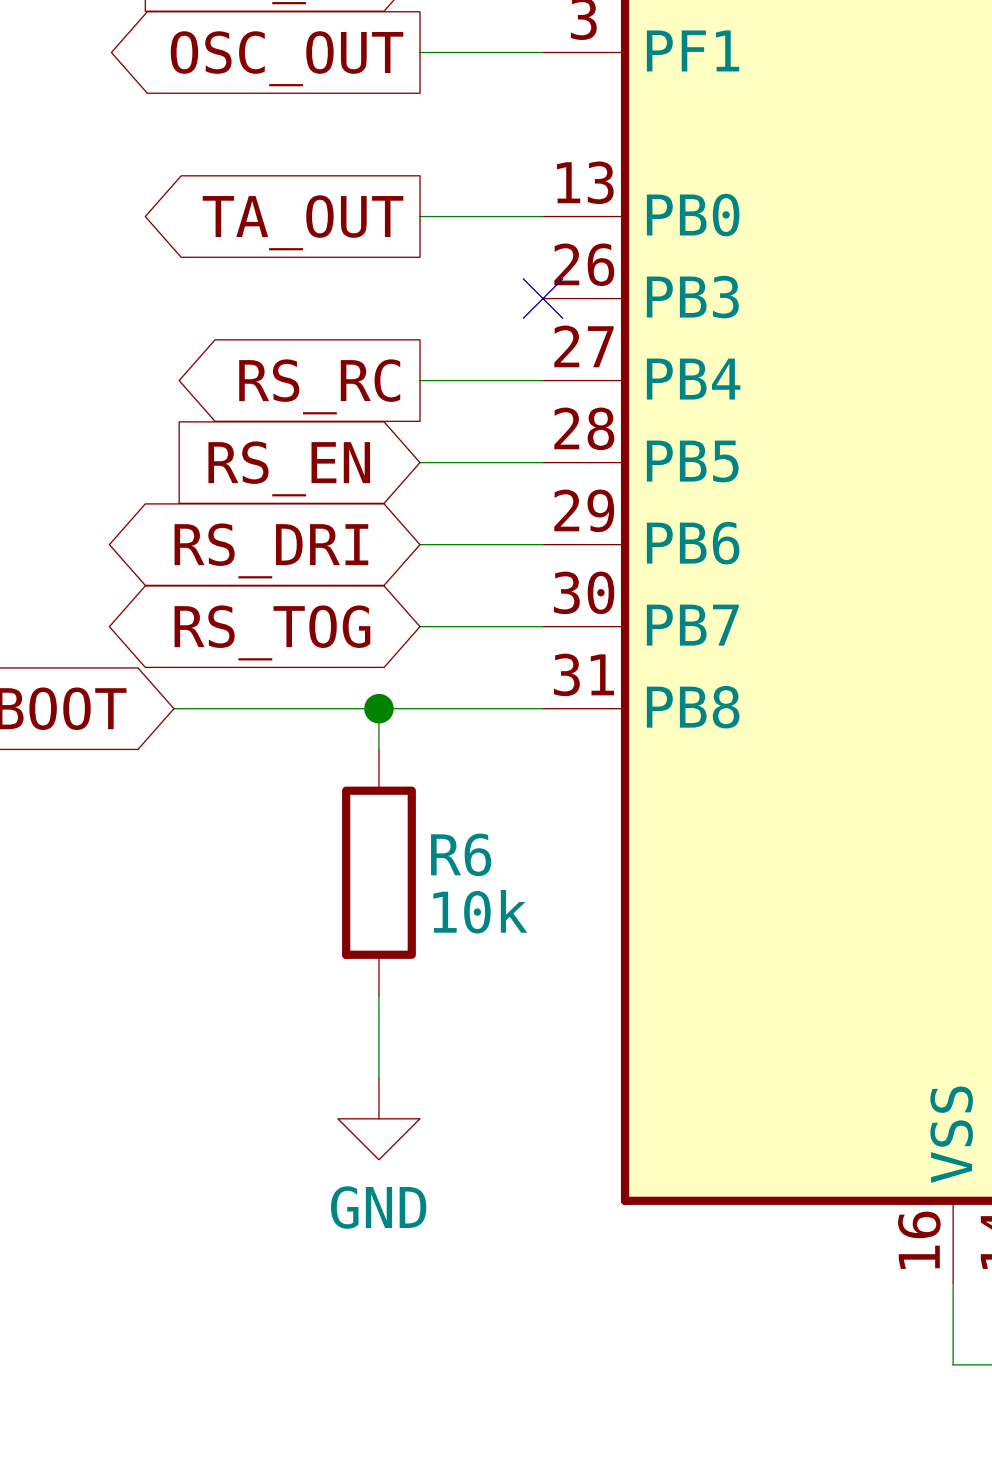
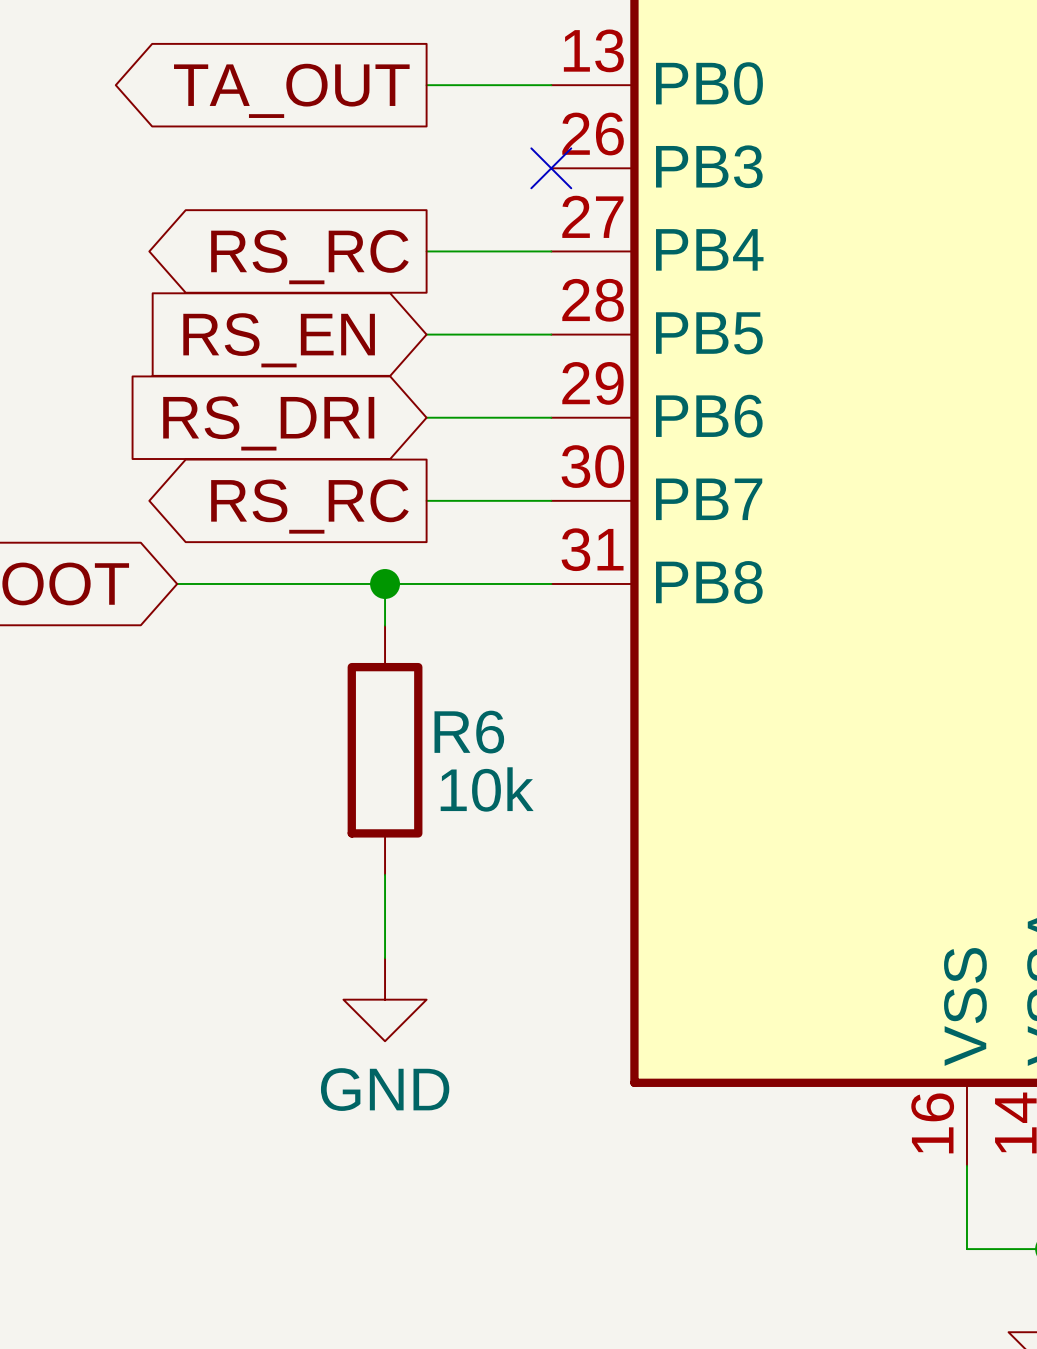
global label shape: bidirectional (271, 550) -> input (268, 423)
global label shape: bidirectional (272, 632) -> output (309, 506)
global label: RS_TOG (272, 632) -> RS_RC (309, 506)

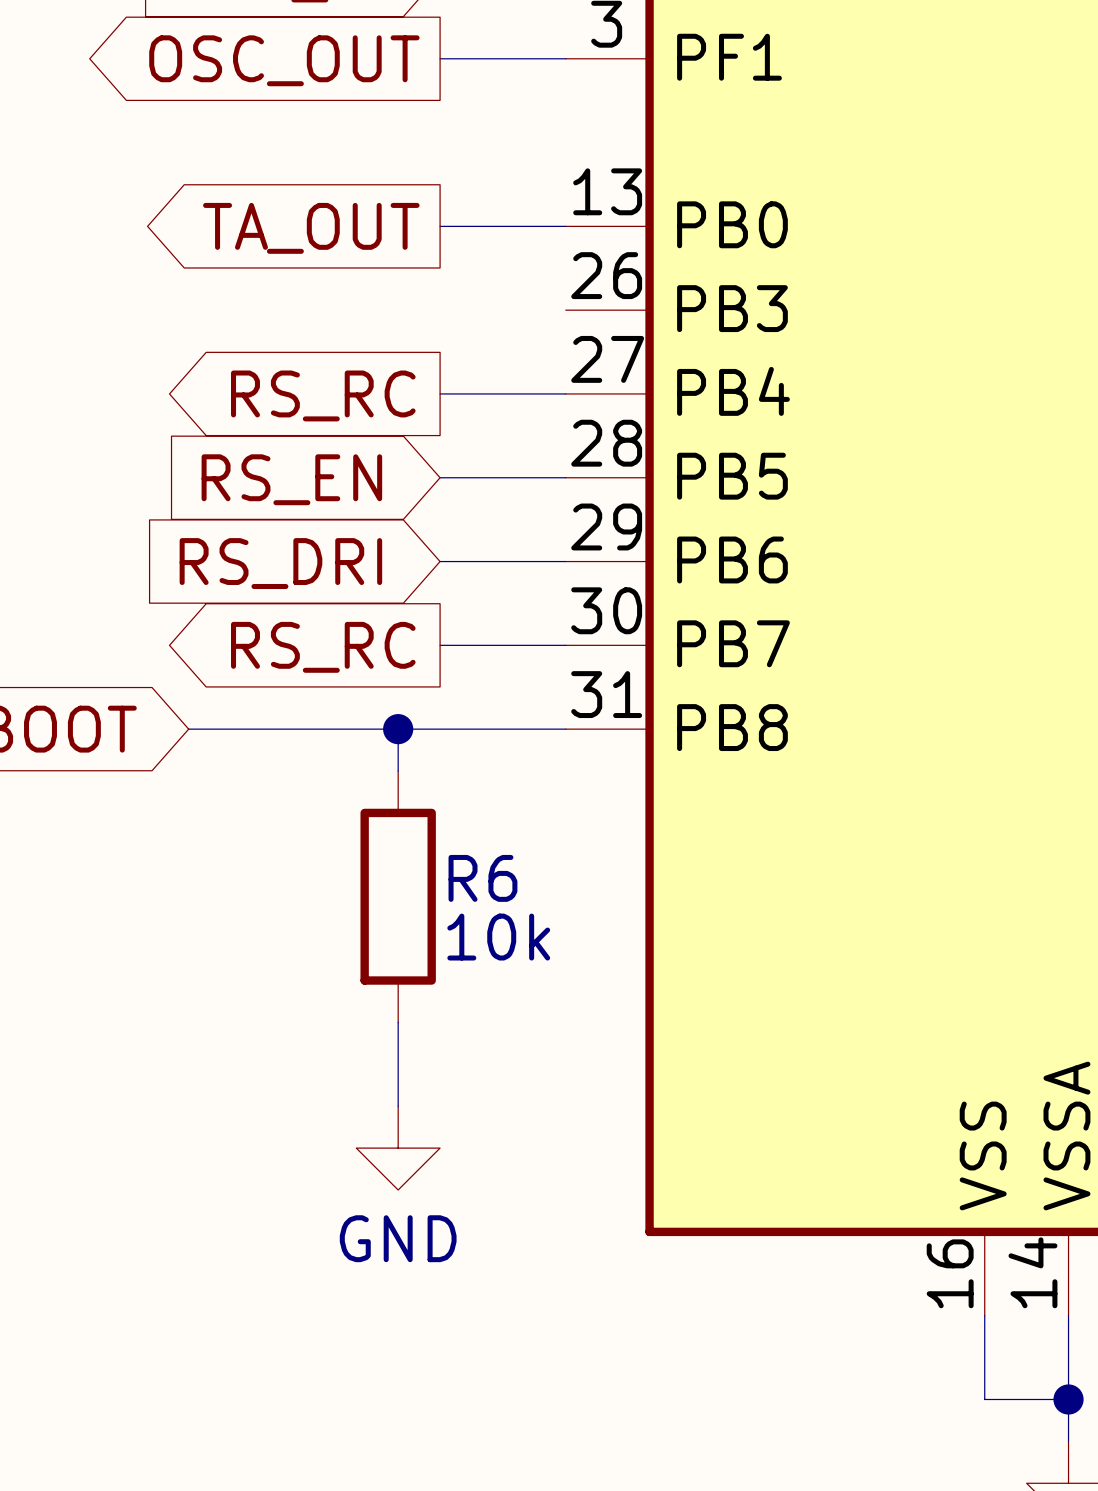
no-connect mark: (551, 168) -> none

